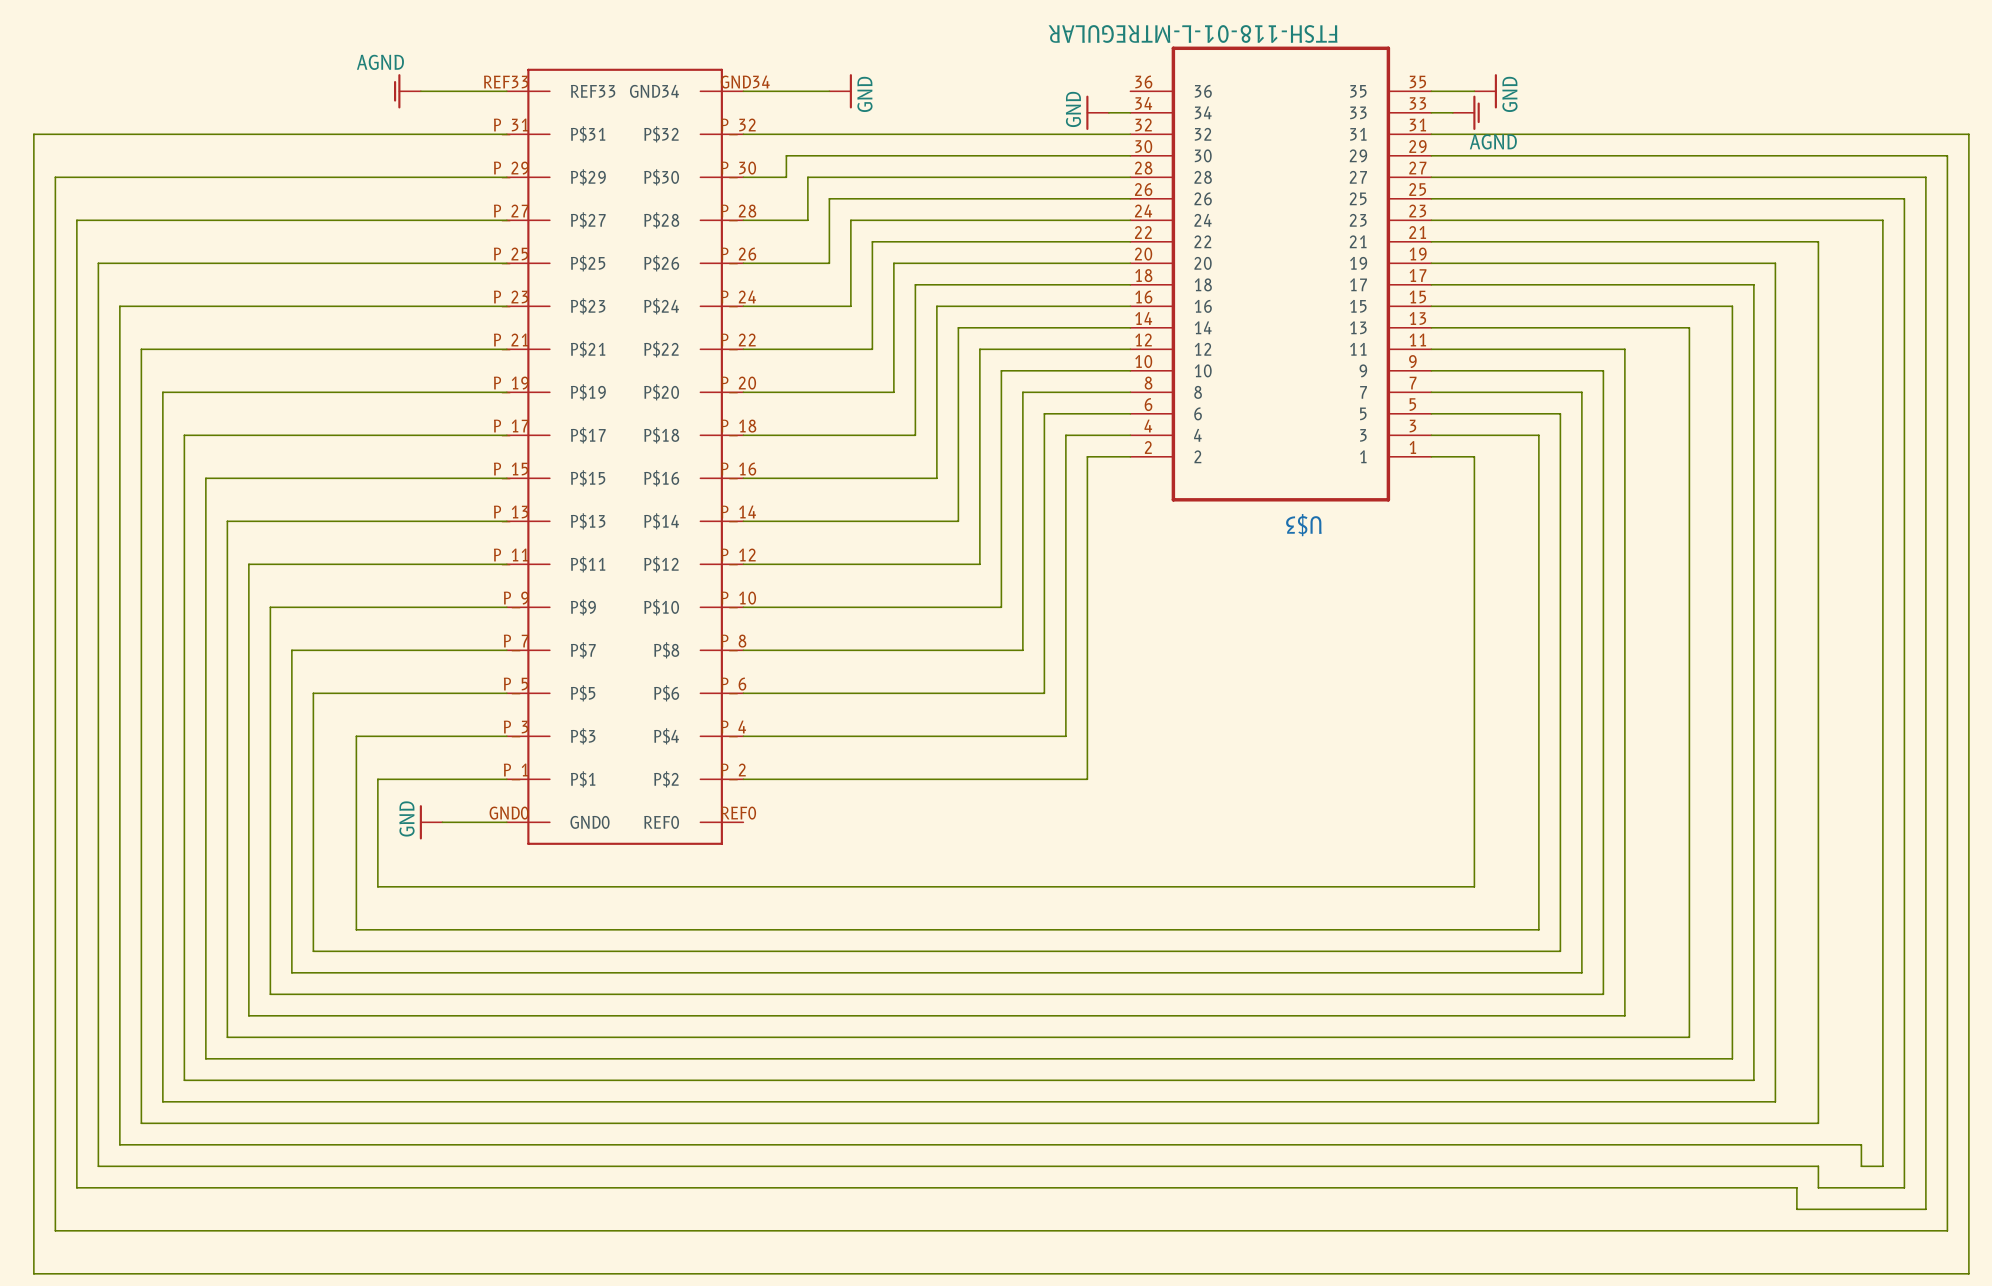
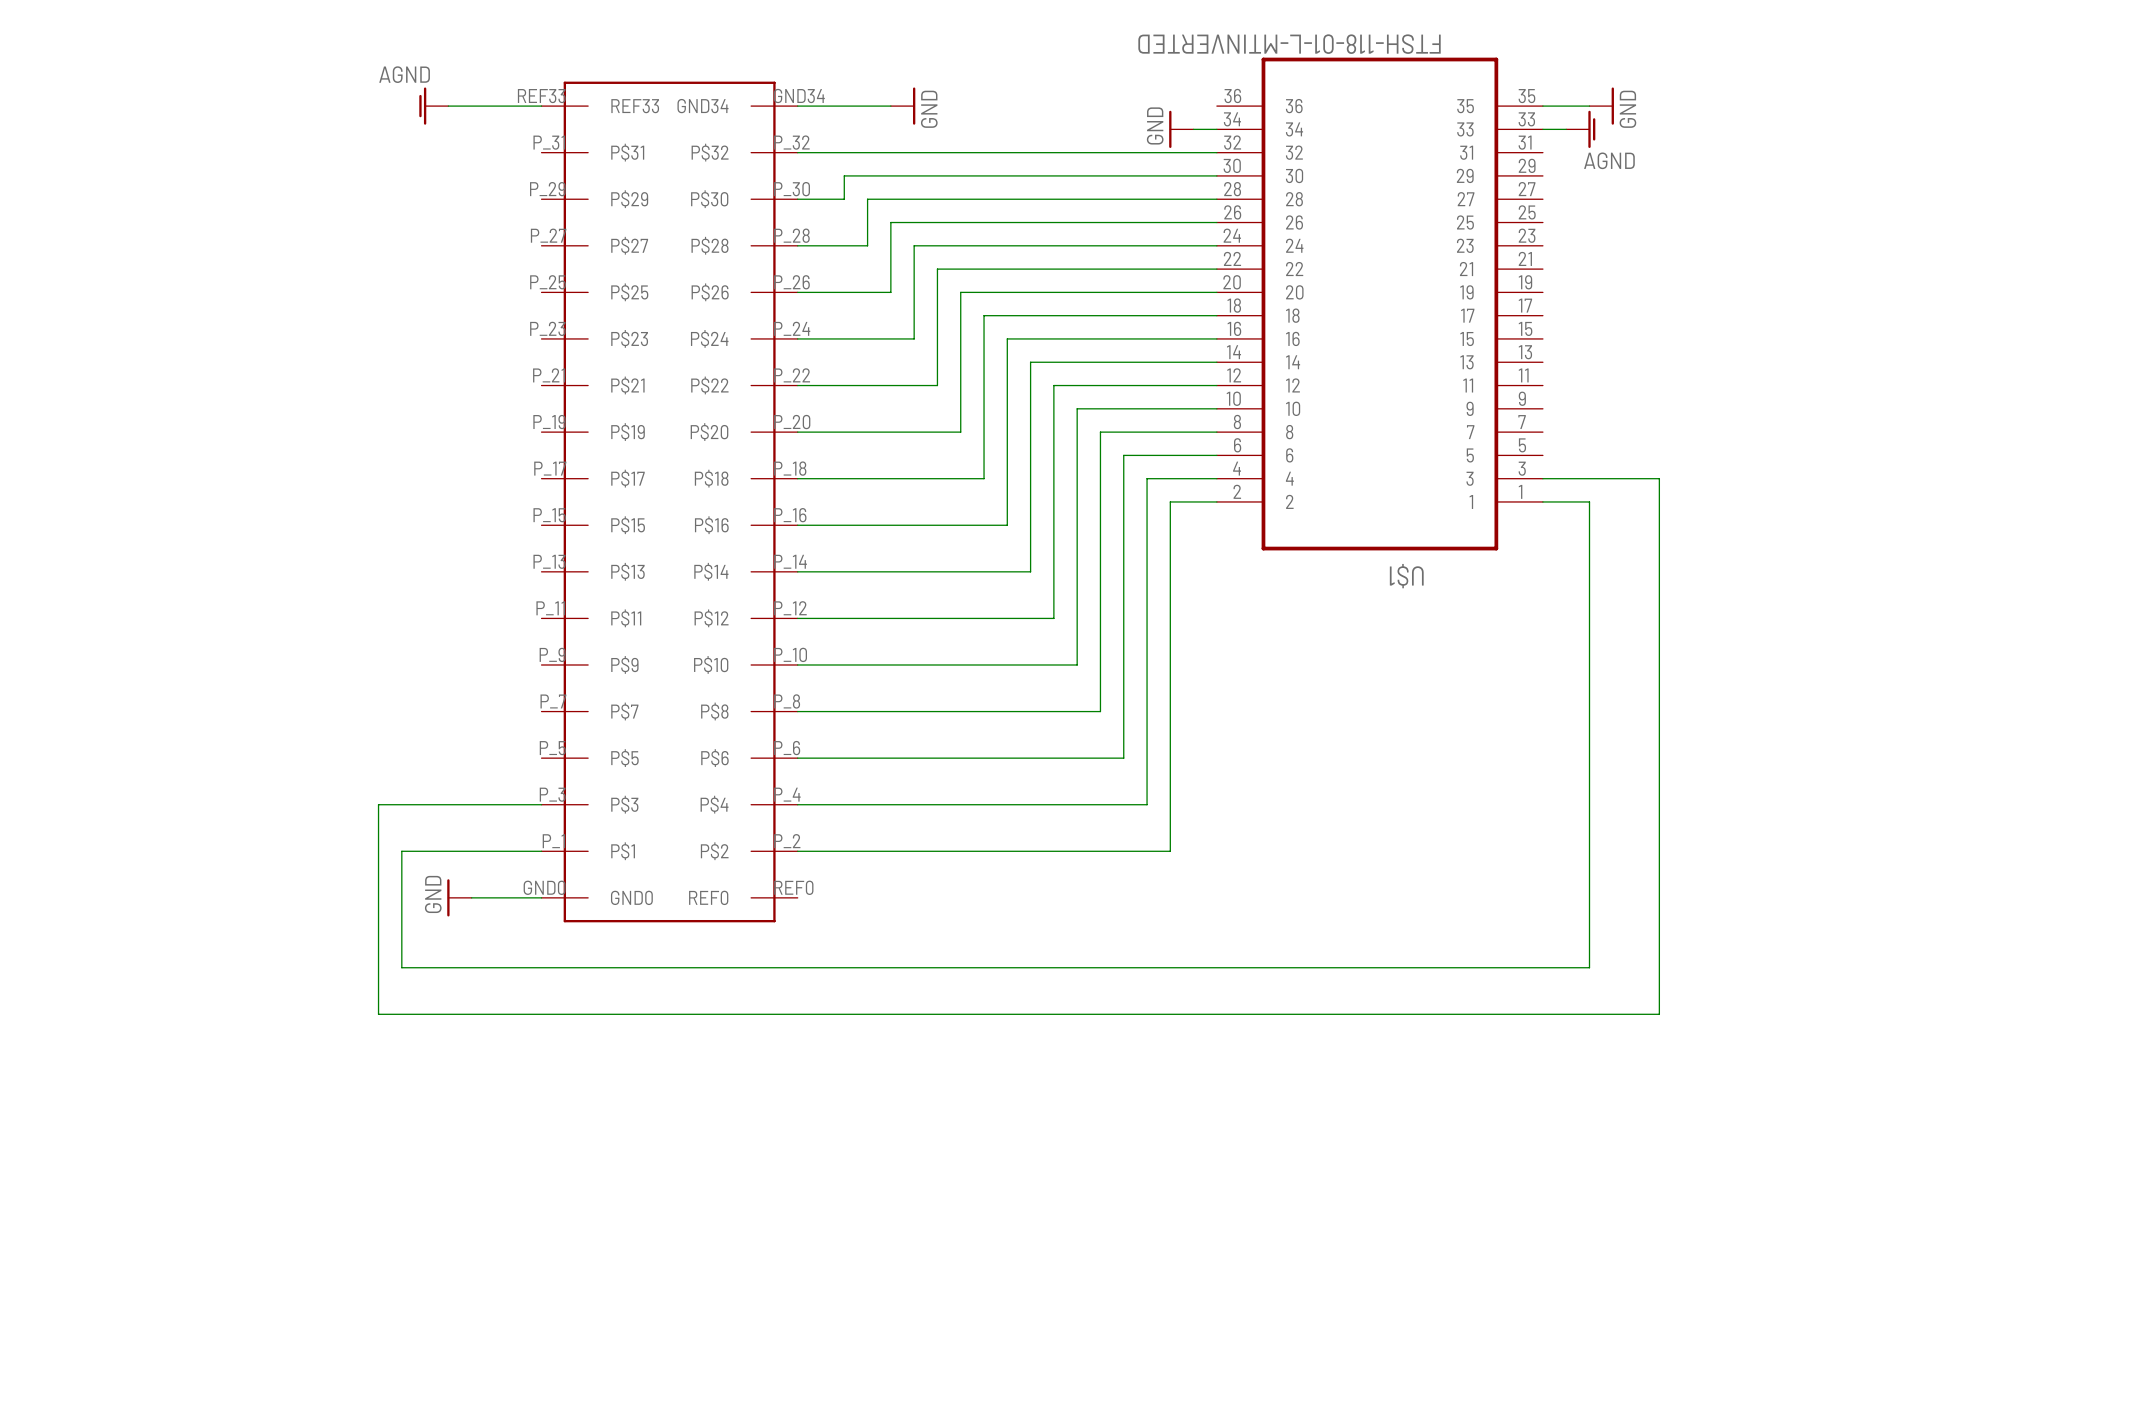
U$3 value: FTSH-118-01-L-MTREGULAR (1193, 34) -> FTSH-118-01-L-MTINVERTED (1289, 44)
wire: (506, 134) (33, 134) (33, 1273) (1968, 1273) (1968, 134) (1431, 134) -> none
wire: (1431, 155) (1947, 155) (1947, 1230) (55, 1230) (55, 177) (506, 177) -> none
wire: (1431, 177) (1925, 177) (1925, 1209) (1796, 1209) (1796, 1187) (76, 1187) (76, 220) (506, 220) -> none
wire: (1431, 198) (1904, 198) (1904, 1187) (1818, 1187) (1818, 1166) (98, 1166) (98, 263) (506, 263) -> none
wire: (1431, 220) (1882, 220) (1882, 1166) (1861, 1166) (1861, 1144) (119, 1144) (119, 306) (506, 306) -> none
wire: (1431, 241) (1818, 241) (1818, 1123) (141, 1123) (141, 349) (506, 349) -> none
wire: (1431, 263) (1775, 263) (1775, 1101) (162, 1101) (162, 392) (506, 392) -> none
wire: (1431, 284) (1753, 284) (1753, 1080) (184, 1080) (184, 435) (506, 435) -> none
wire: (1431, 306) (1732, 306) (1732, 1058) (205, 1058) (205, 478) (506, 478) -> none
wire: (1431, 327) (1689, 327) (1689, 1037) (227, 1037) (227, 521) (506, 521) -> none
wire: (1431, 349) (1624, 349) (1624, 1015) (248, 1015) (248, 564) (506, 564) -> none
wire: (1431, 370) (1603, 370) (1603, 994) (270, 994) (270, 607) (506, 607) -> none
wire: (1431, 392) (1581, 392) (1581, 972) (291, 972) (291, 650) (506, 650) -> none
wire: (1431, 413) (1560, 413) (1560, 951) (313, 951) (313, 693) (506, 693) -> none
U$3 name: U$3 (1303, 525) -> U$1 (1406, 576)

